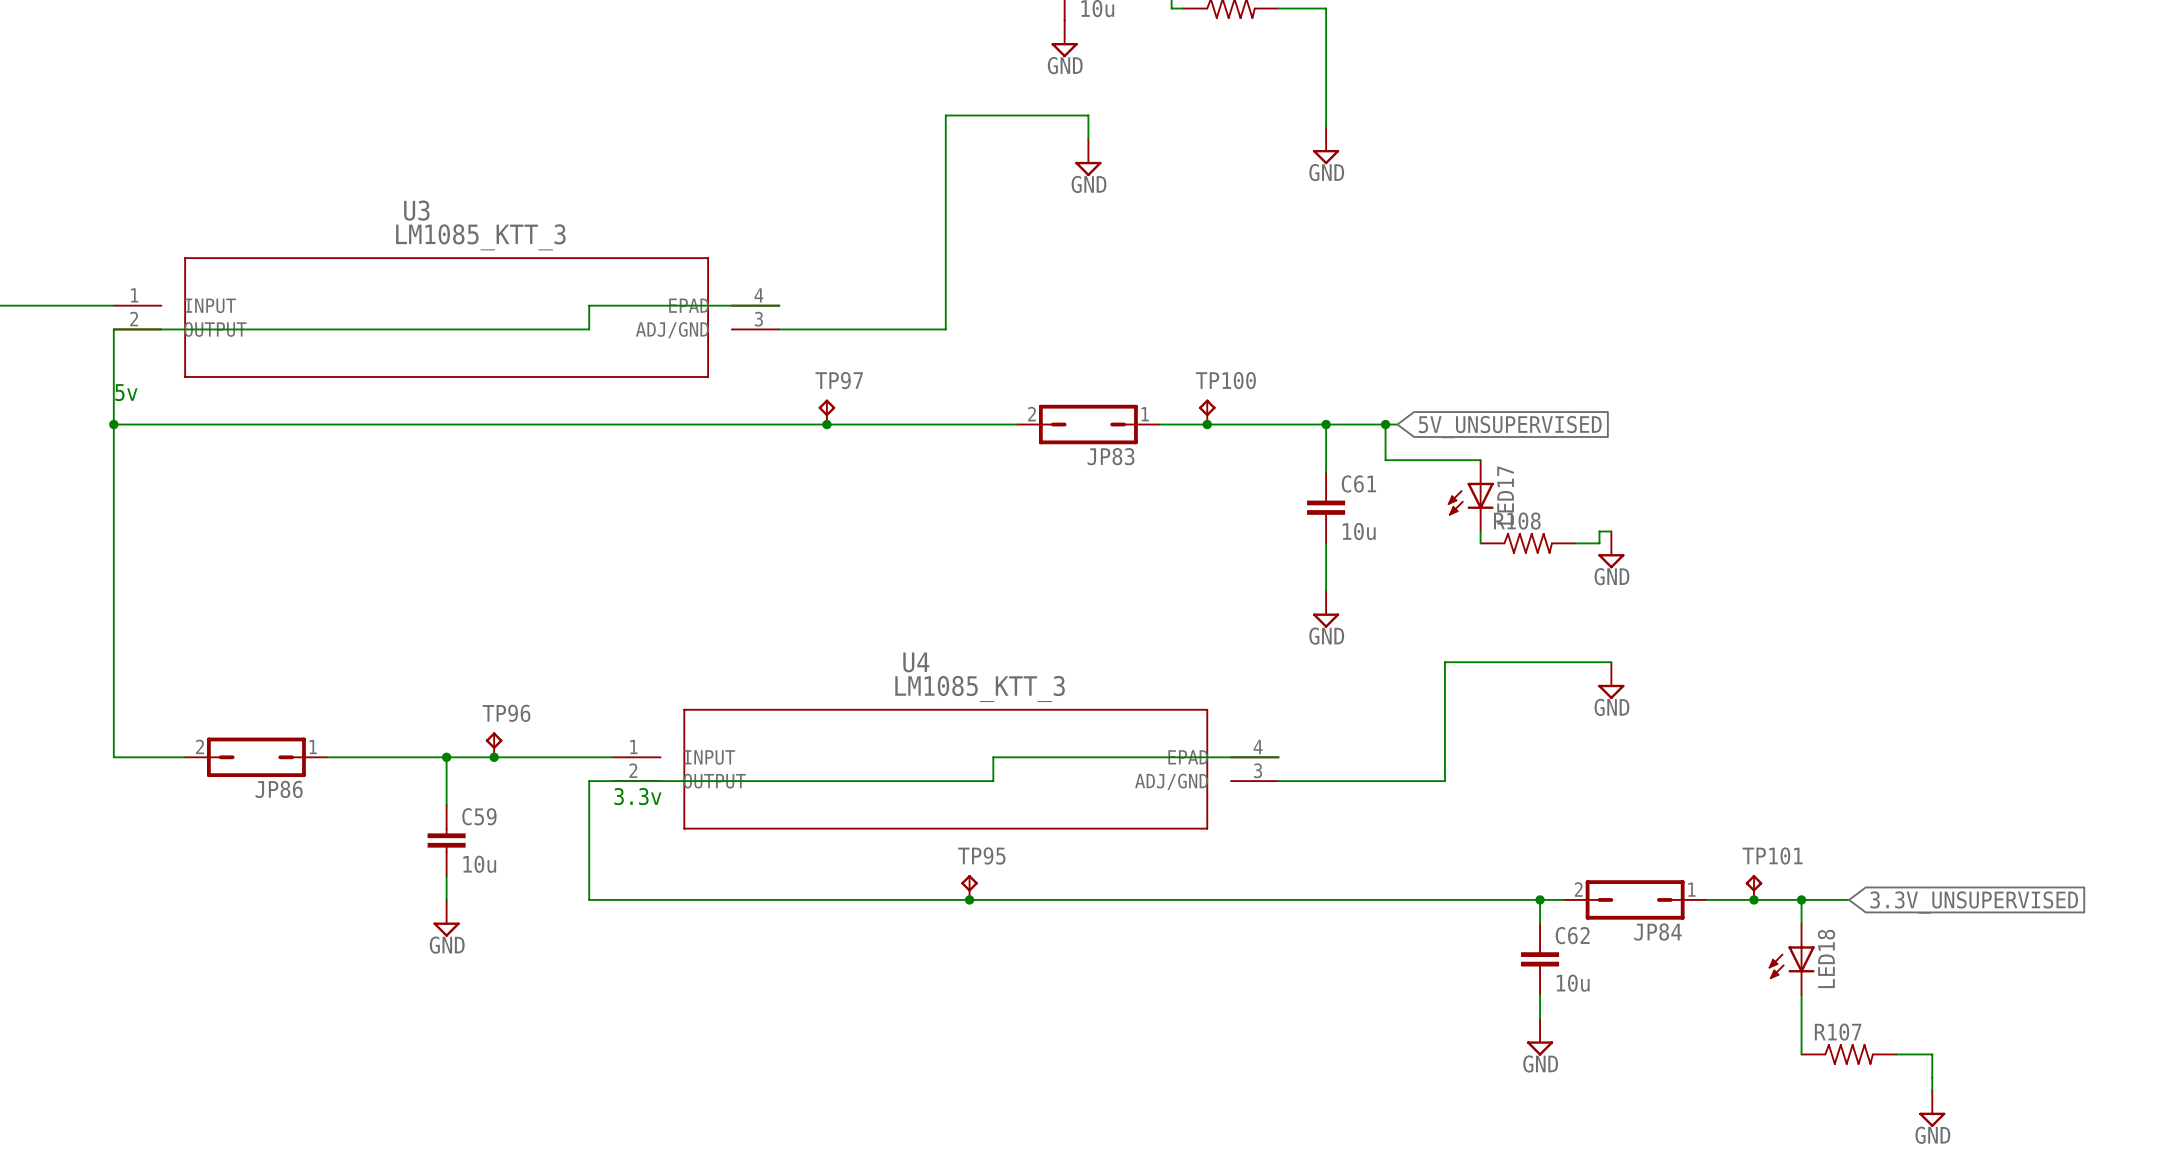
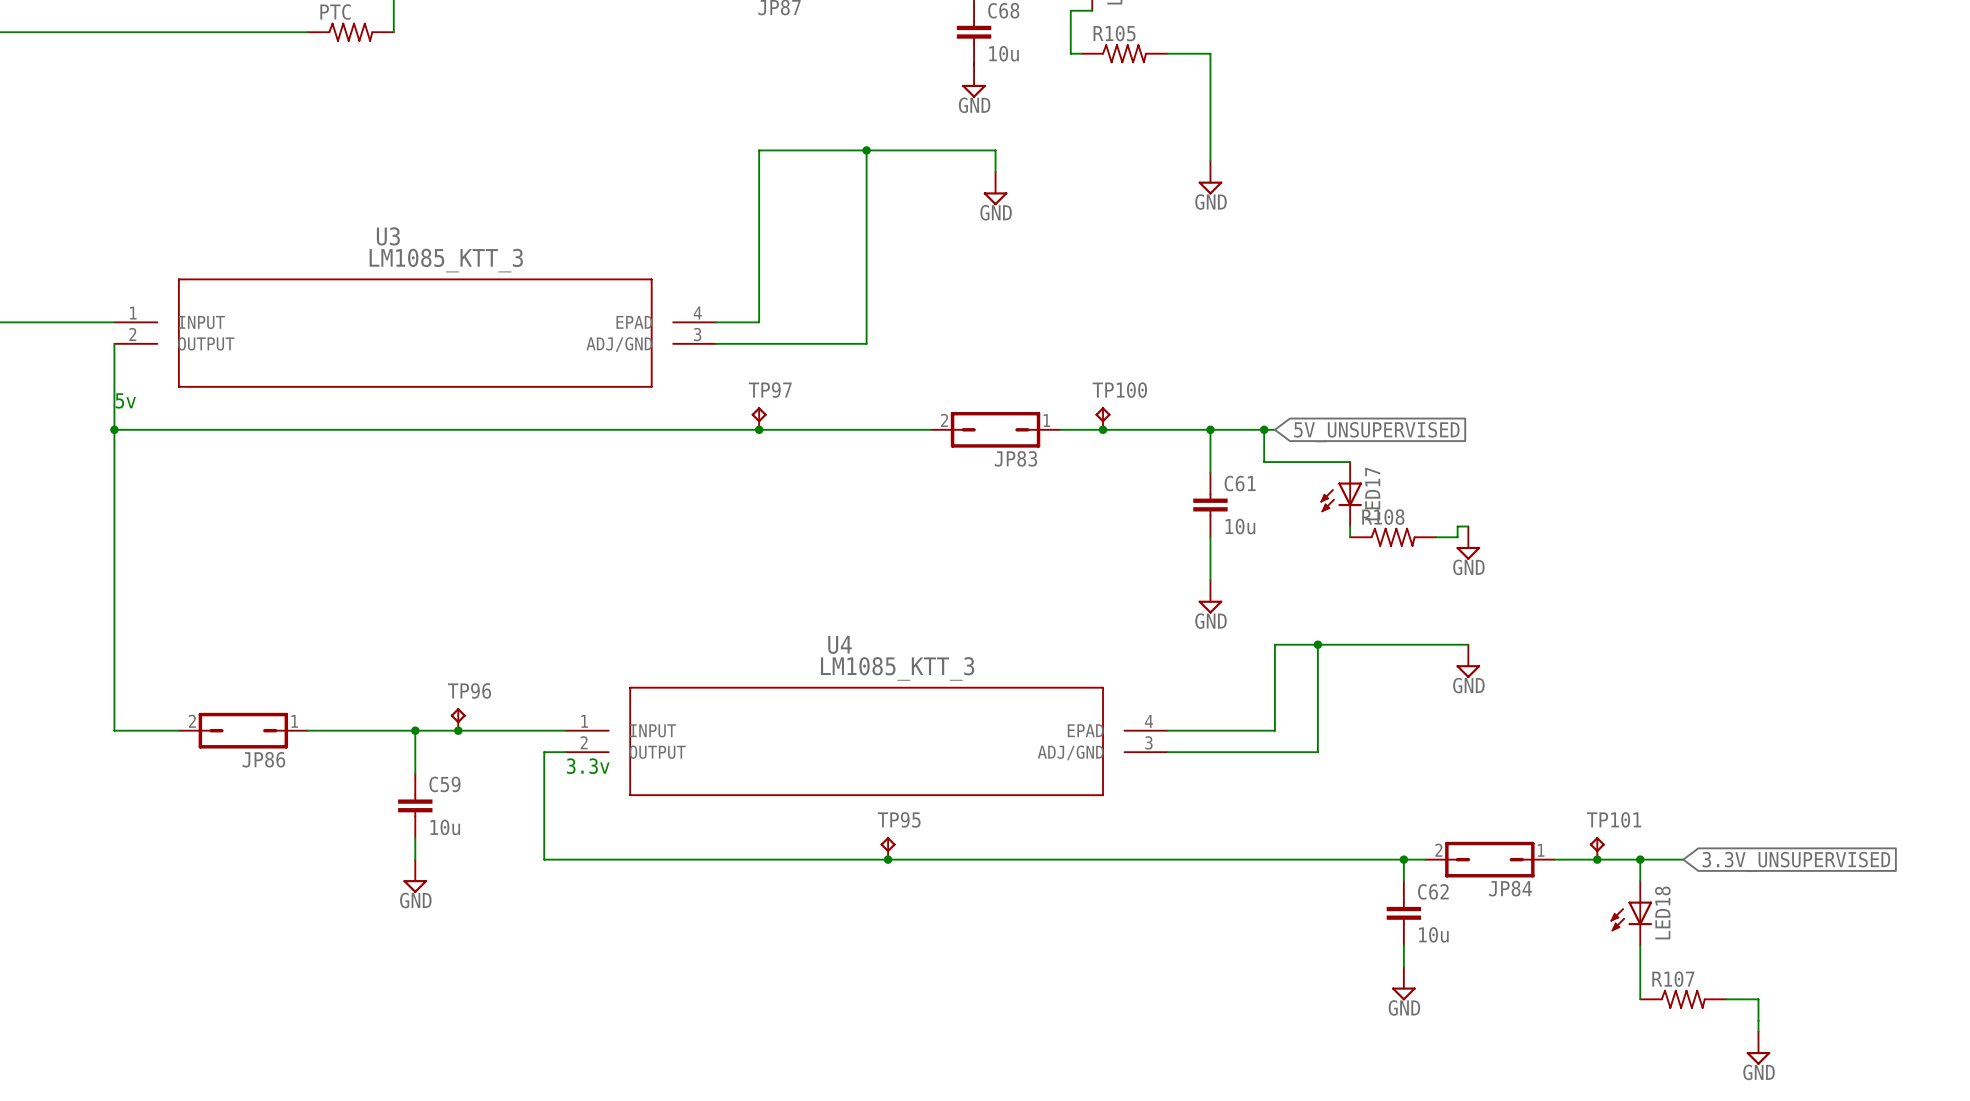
junction: none -> (866, 150)
wire: (779, 305) (589, 305) (589, 329) (113, 329) -> (716, 322) (759, 322) (759, 150) (866, 150)
junction: none -> (1317, 644)
wire: (1278, 757) (993, 757) (993, 781) (612, 781) -> (1167, 730) (1274, 730) (1274, 644) (1317, 644)

